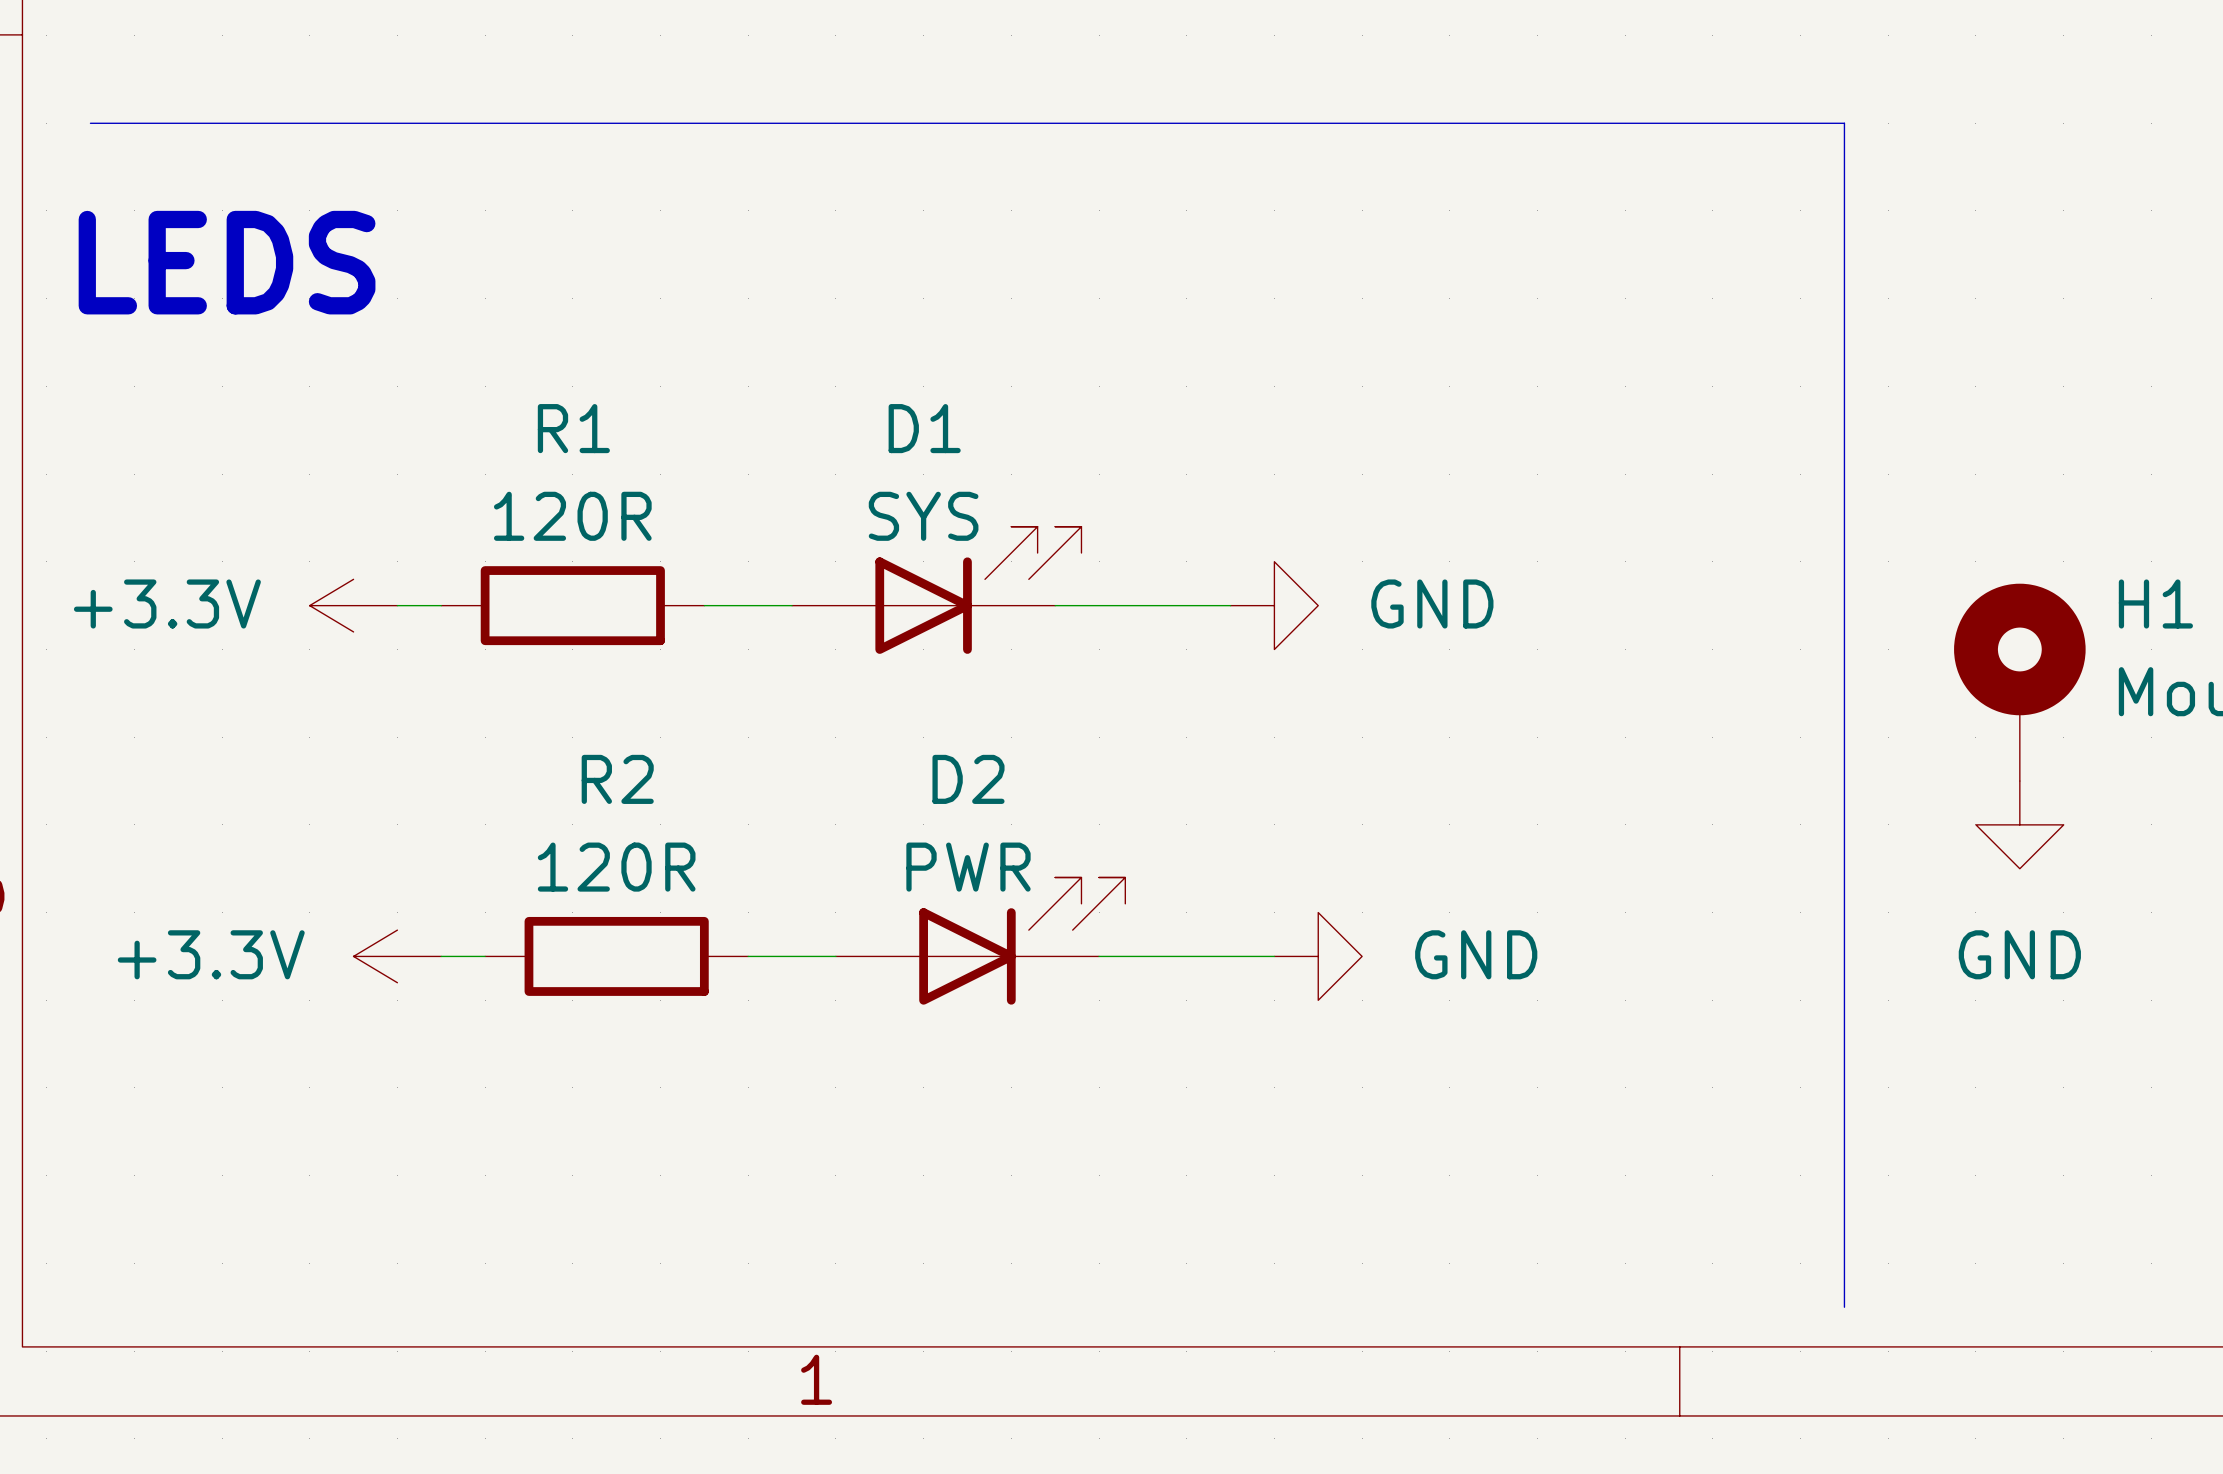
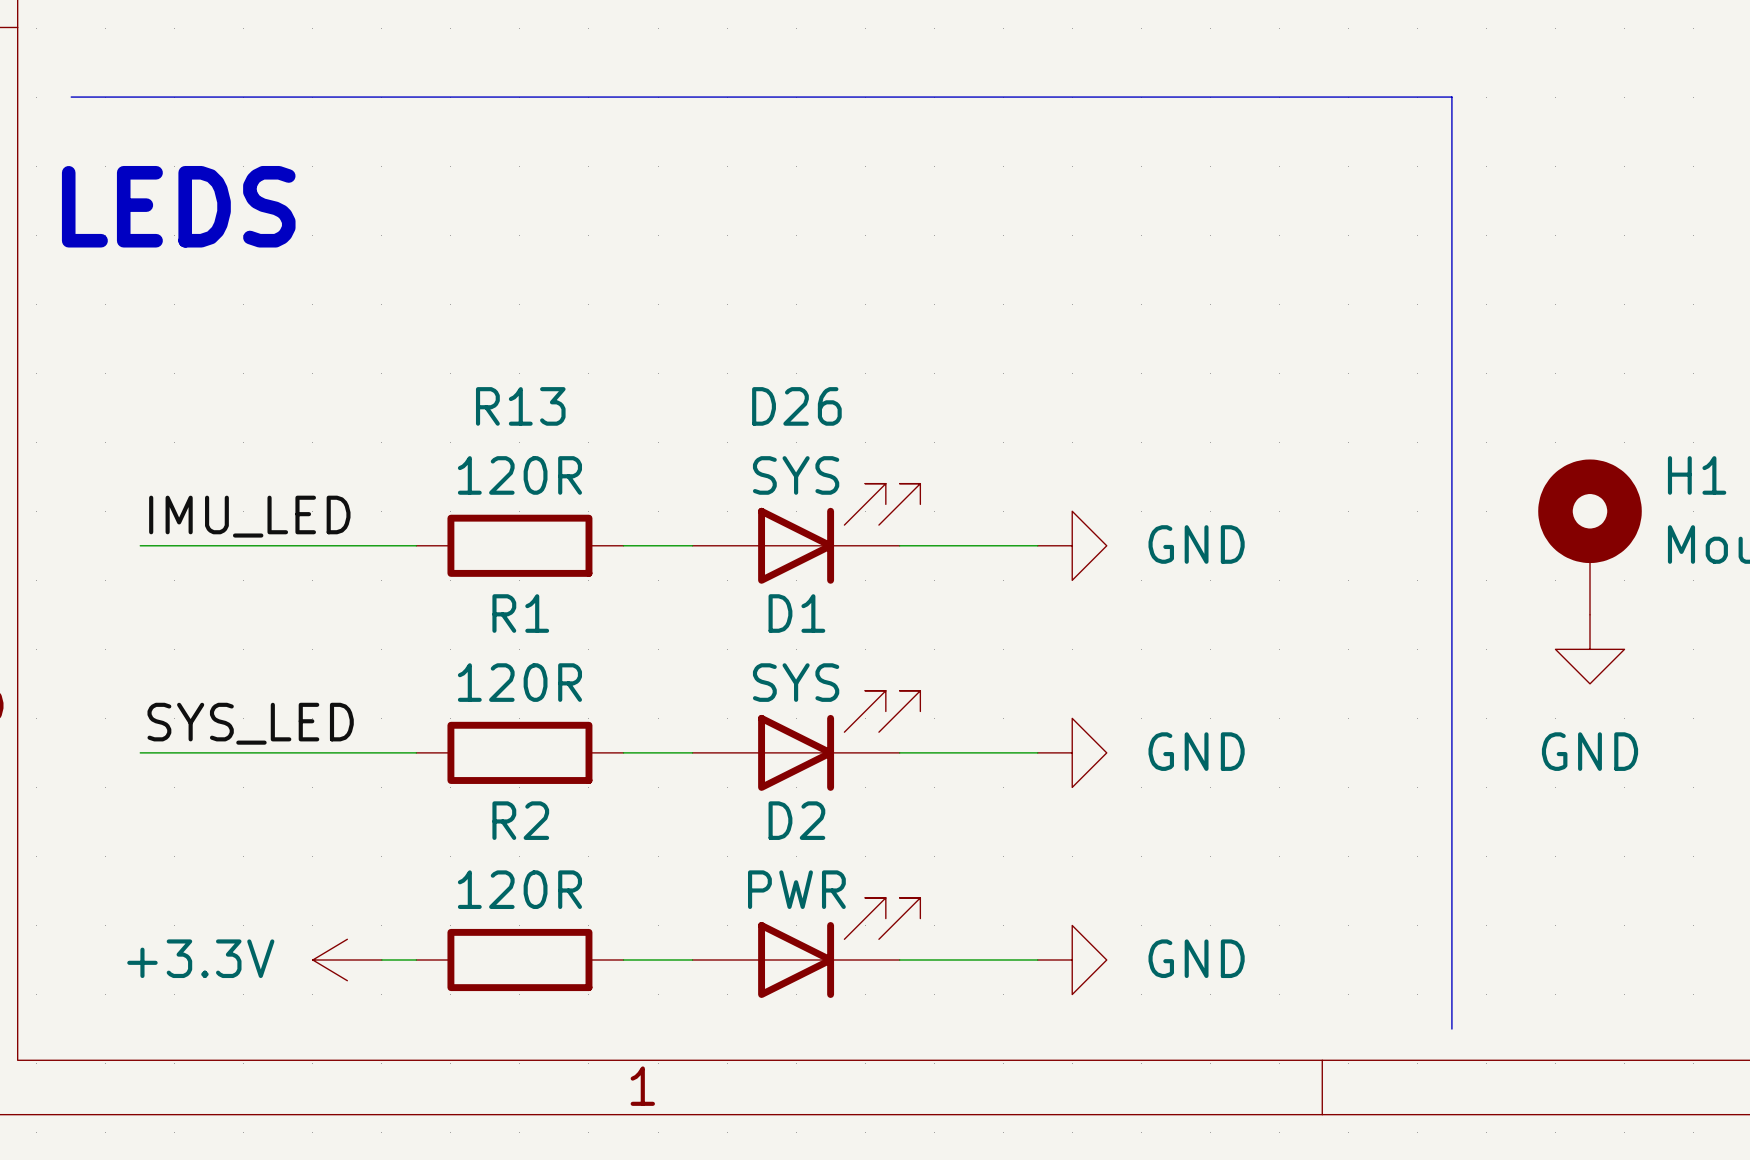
D1 position: (936, 590) -> (806, 740)
power symbol: +3.3V (353, 605) -> none
wire: (397, 605) (441, 605) -> (381, 960) (416, 960)
R1 position: (572, 605) -> (519, 752)
wire: (704, 605) (792, 605) -> (623, 960) (692, 960)
wire: (1055, 605) (1230, 605) -> (899, 960) (1037, 960)
power symbol position: GND (1274, 605) -> GND (1072, 545)
label: none -> IMU_LED (249, 516)
D26: none -> SYS (806, 533)
wire: none -> (140, 545) (416, 545)
R13: none -> 120R (519, 545)
wire: none -> (623, 545) (692, 545)
wire: none -> (899, 545) (1037, 545)
label: none -> SYS_LED (250, 723)
D2 position: (980, 941) -> (806, 947)
wire: none -> (140, 752) (347, 752)
power symbol position: +3.3V (397, 956) -> +3.3V (347, 960)
R2 position: (616, 956) -> (519, 960)
power symbol position: GND (1318, 956) -> GND (1072, 752)
power symbol: none -> GND (1072, 960)

